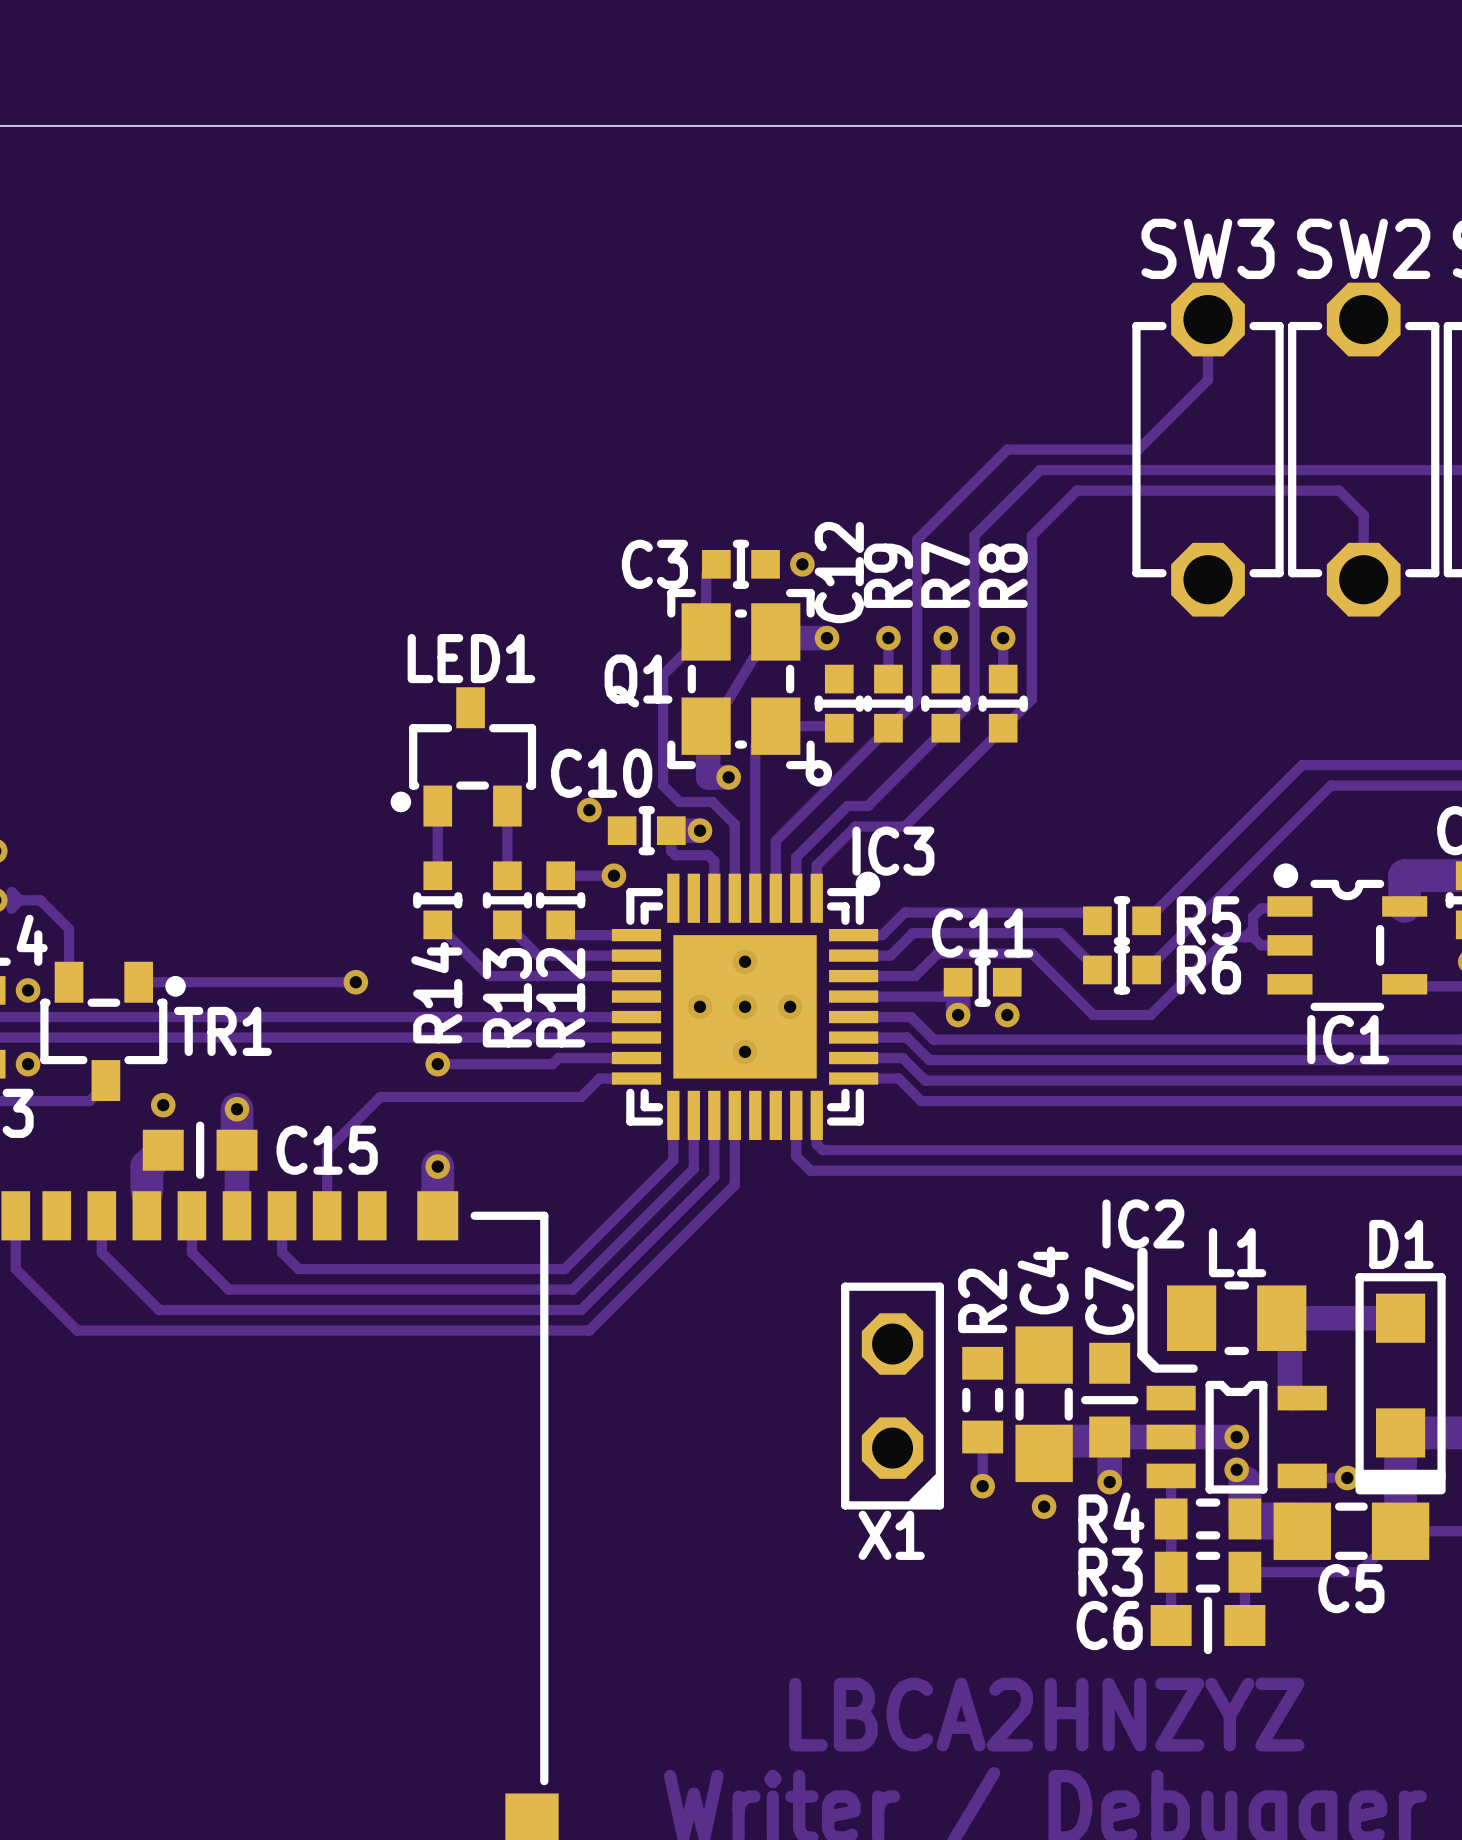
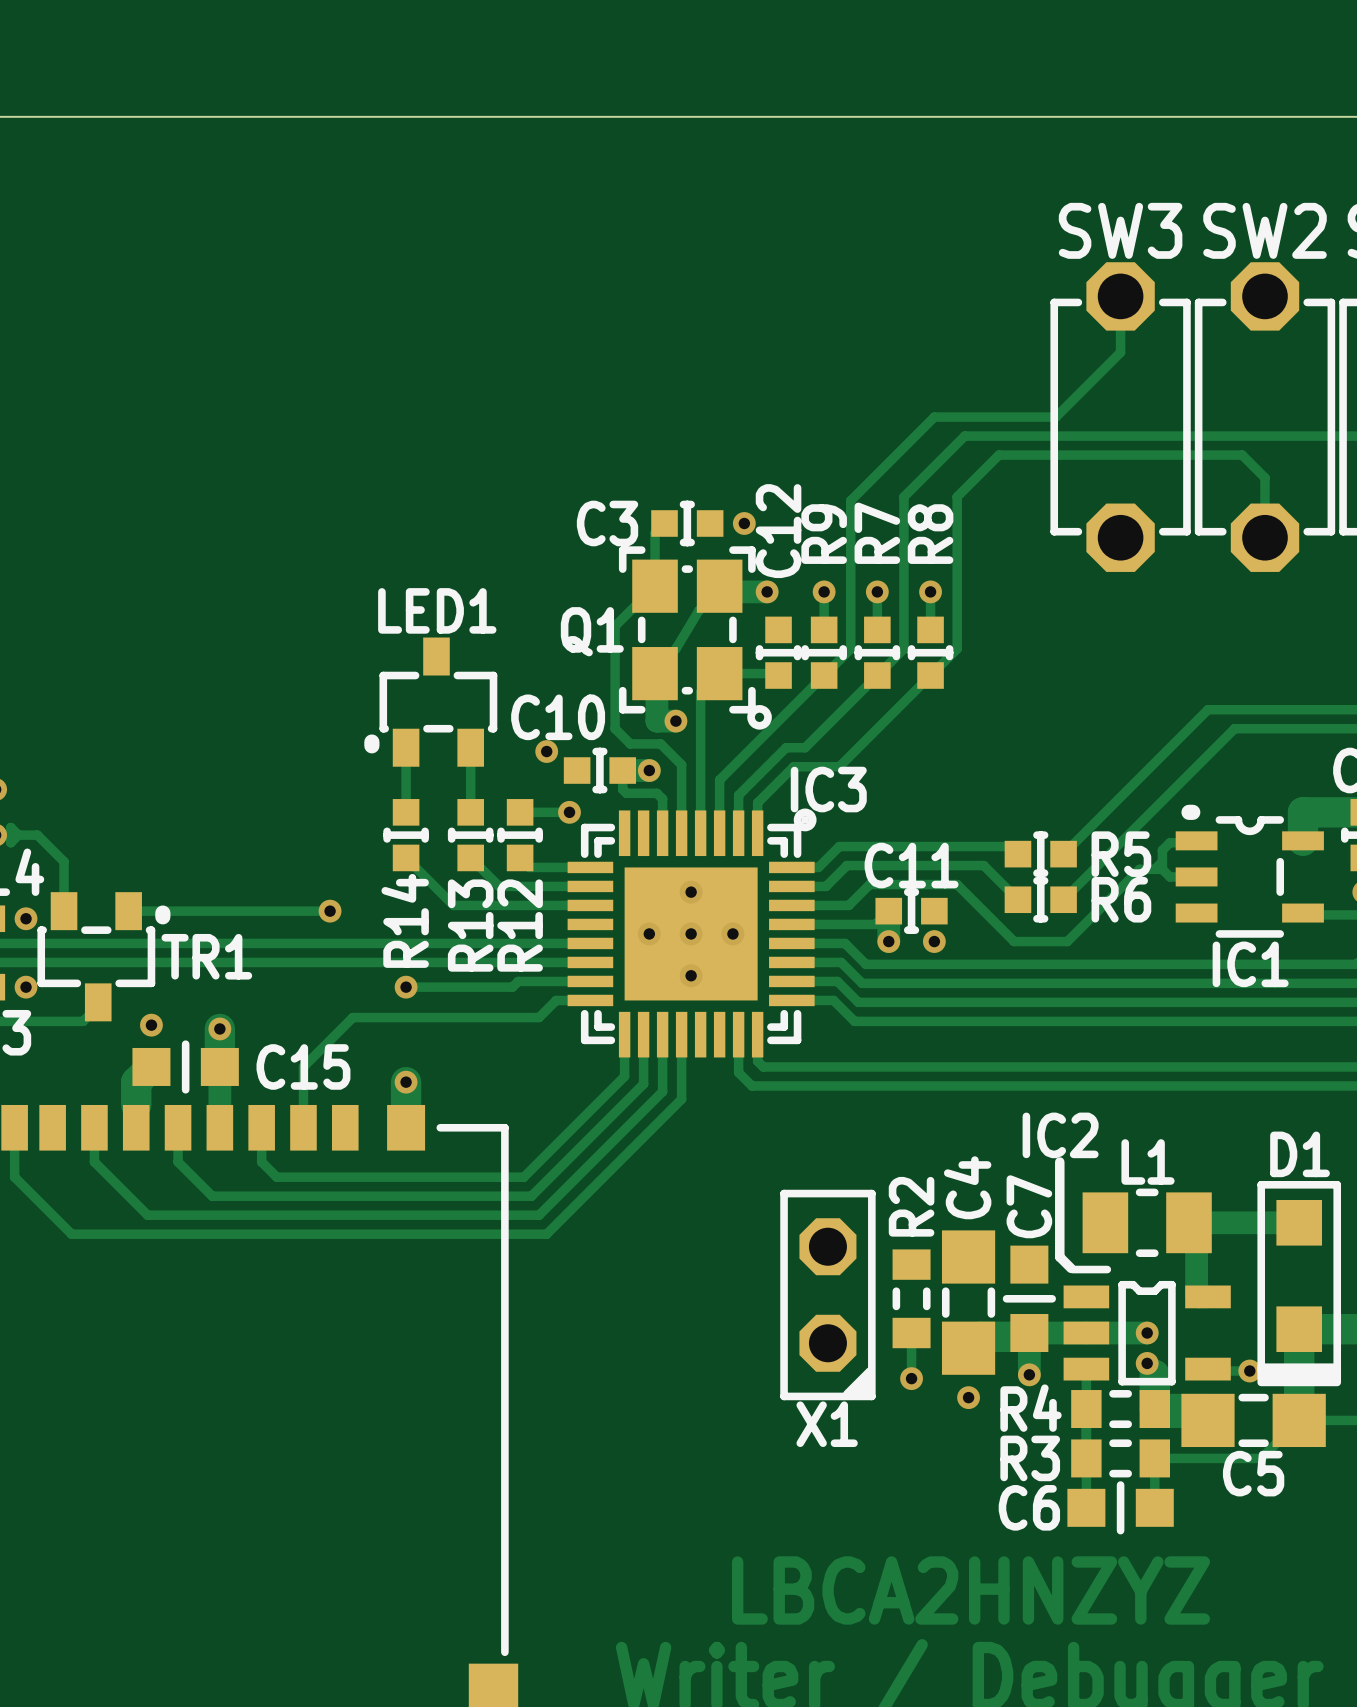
LED1 footprint: [390, 687, 537, 827] -> [364, 637, 498, 767]
IC1 footprint: [1267, 863, 1428, 1011] -> [1175, 804, 1324, 938]
TR1 footprint: [40, 961, 186, 1102] -> [37, 892, 171, 1022]

